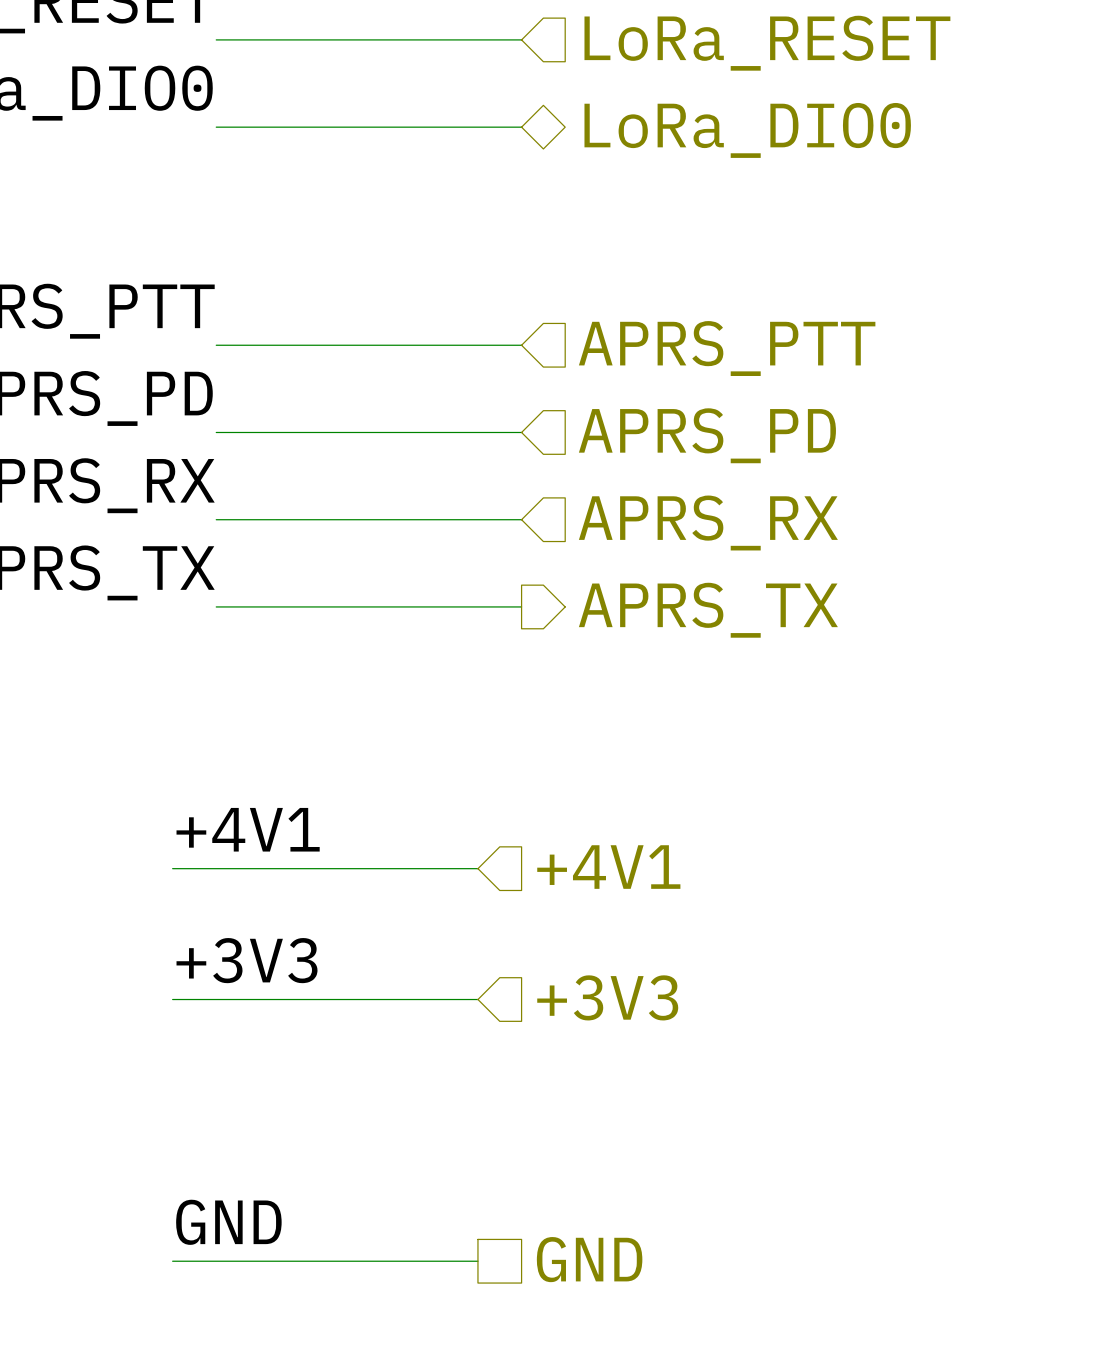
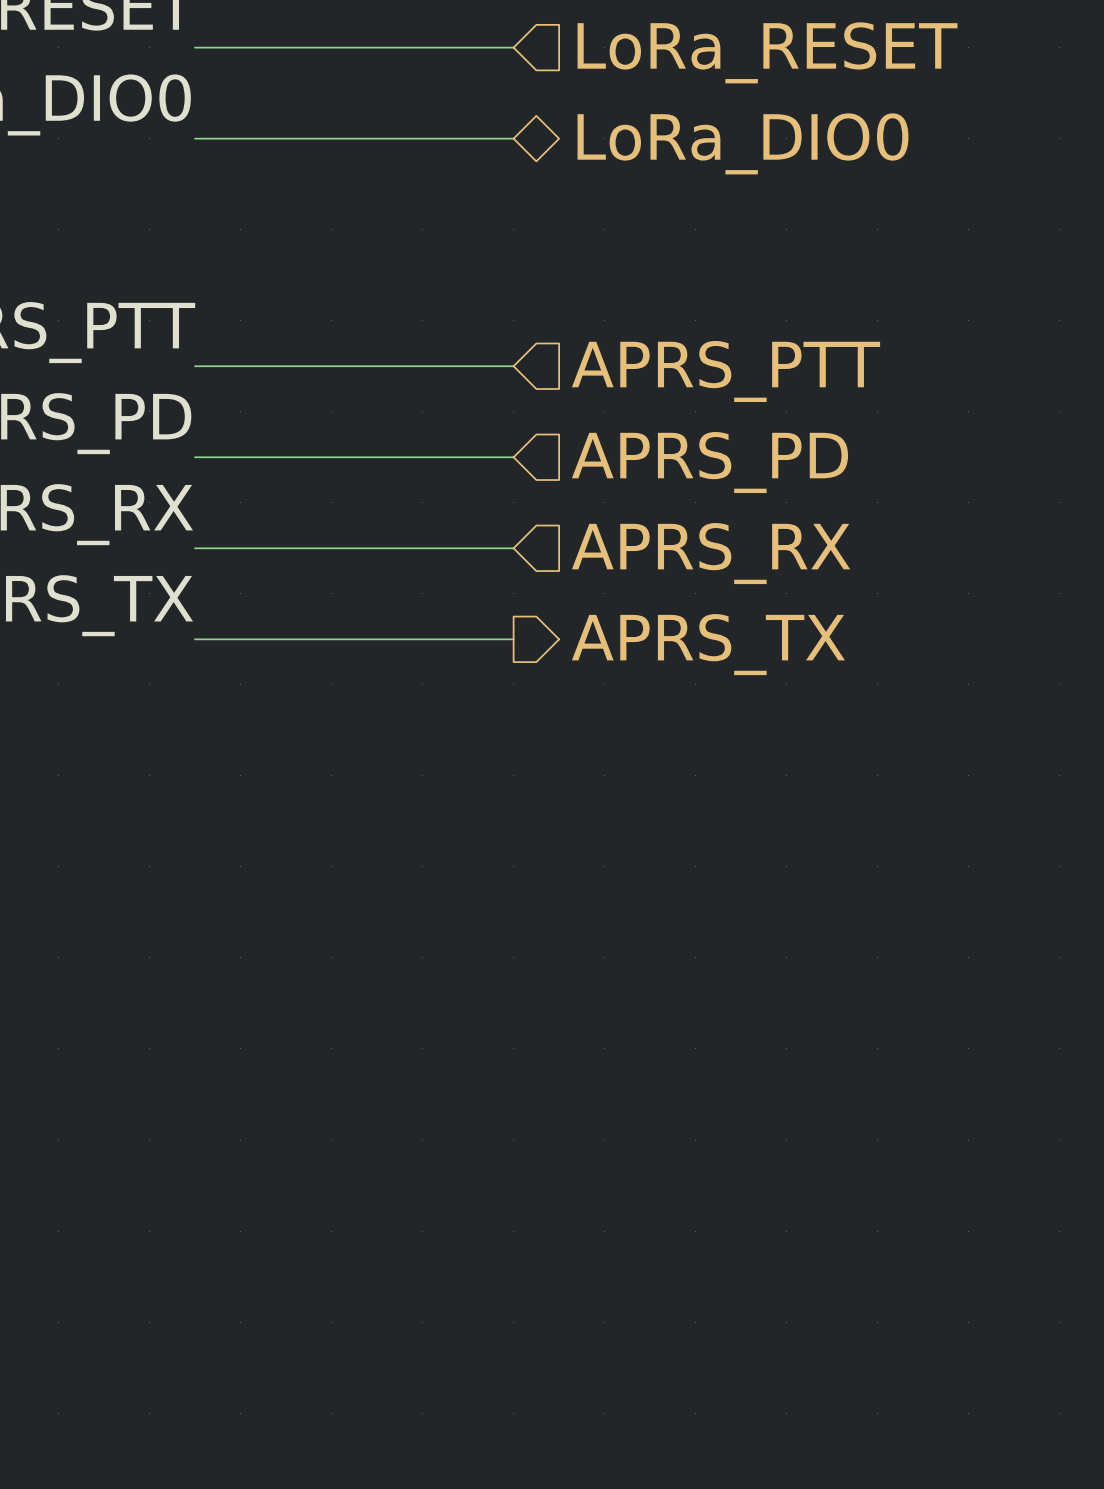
label: +4V1 (248, 829) -> none
hierarchical label: +4V1 (608, 867) -> none
wire: (172, 868) (477, 868) -> none
label: +3V3 (247, 960) -> none
hierarchical label: +3V3 (607, 997) -> none
wire: (172, 999) (477, 999) -> none
label: GND (228, 1222) -> none
hierarchical label: GND (589, 1259) -> none
wire: (172, 1261) (477, 1261) -> none

